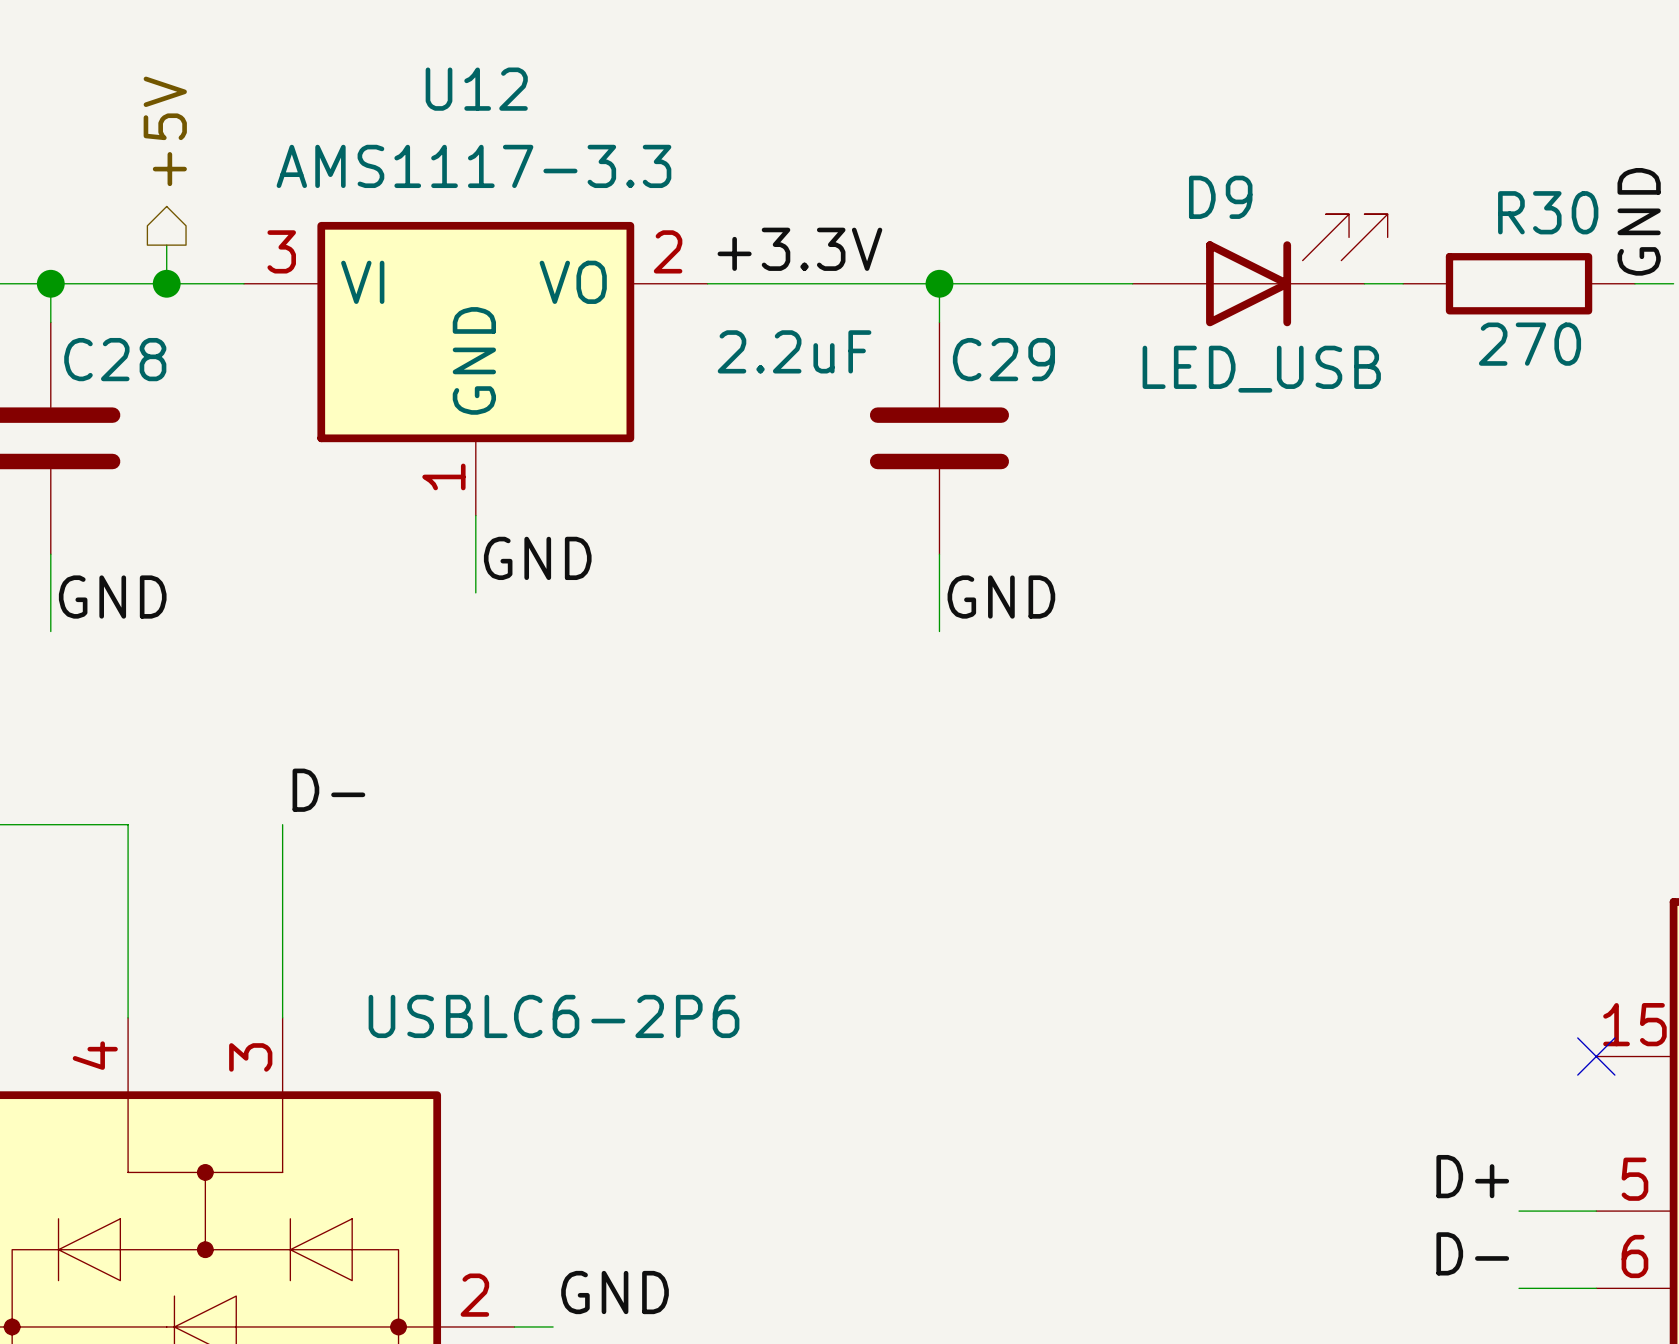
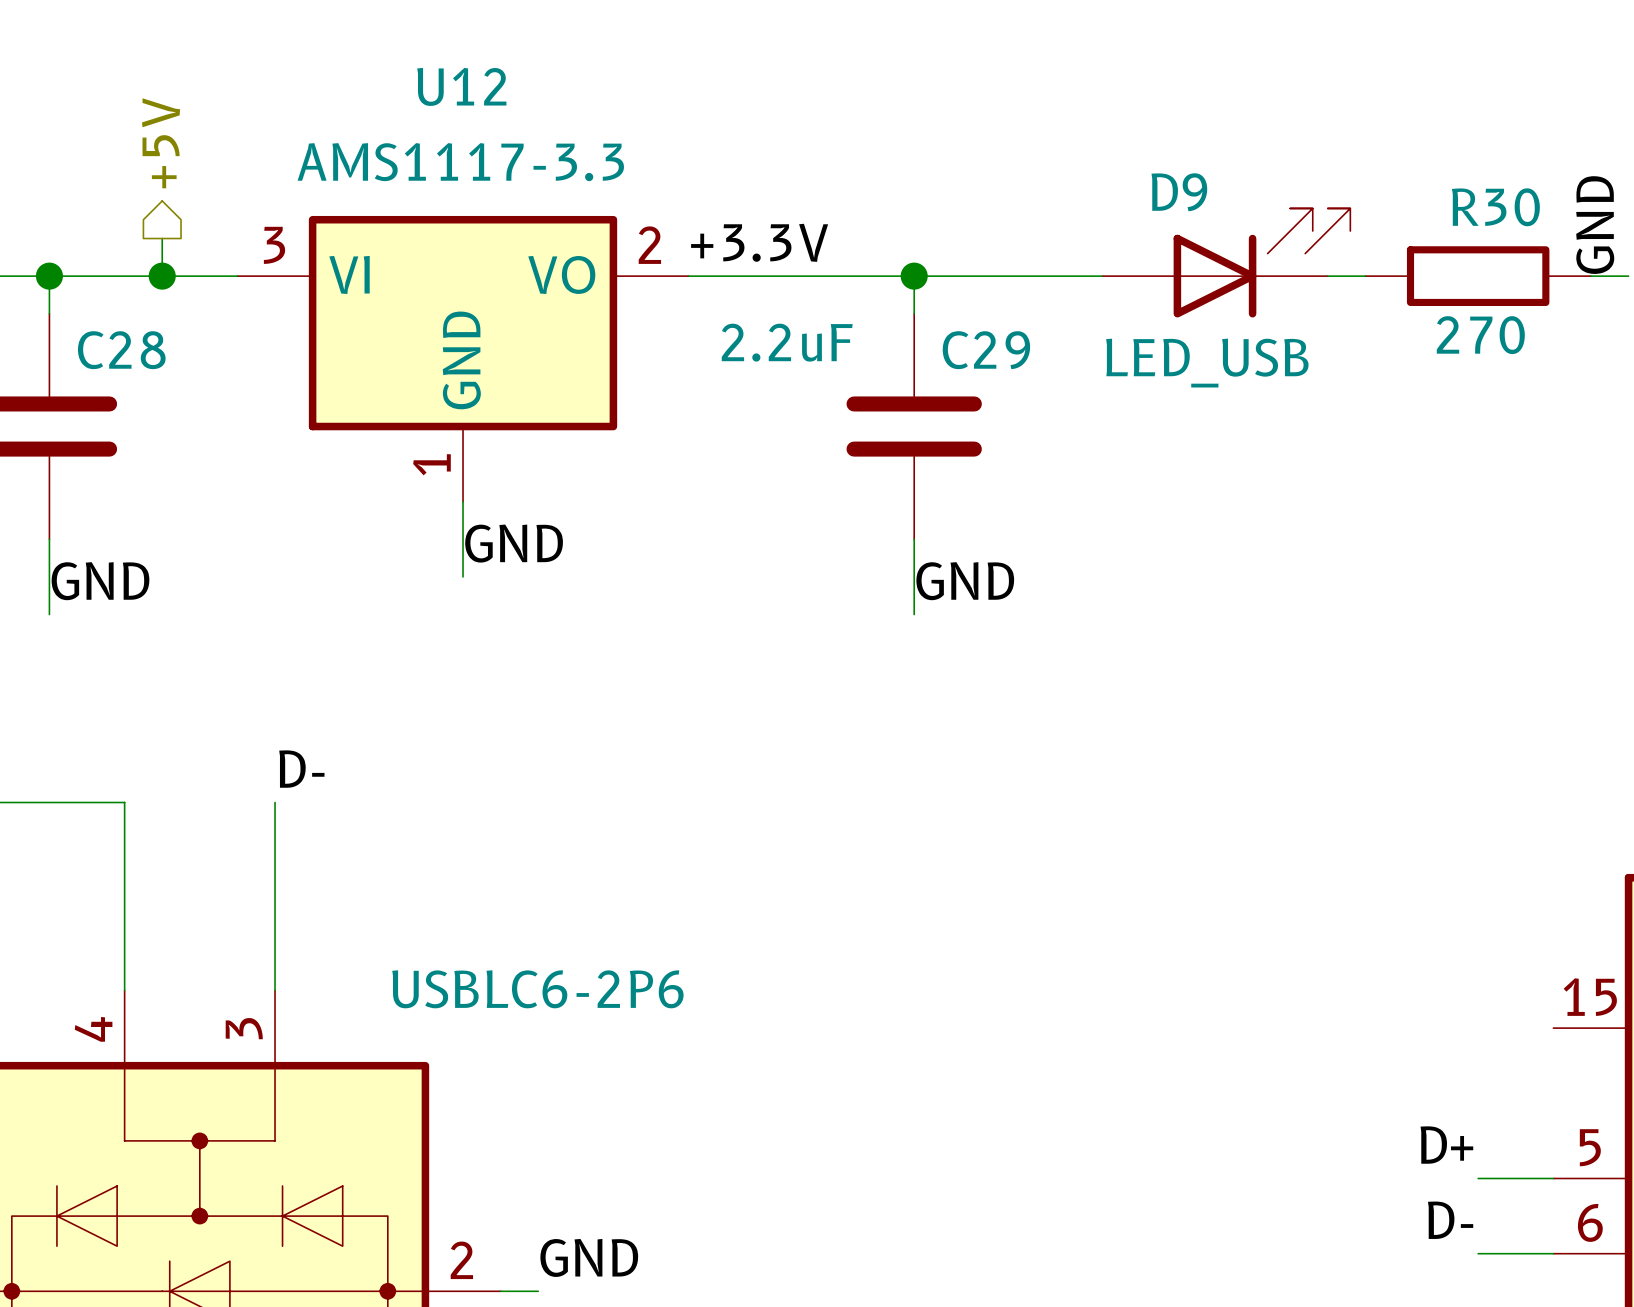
no-connect mark: (1596, 1056) -> none

